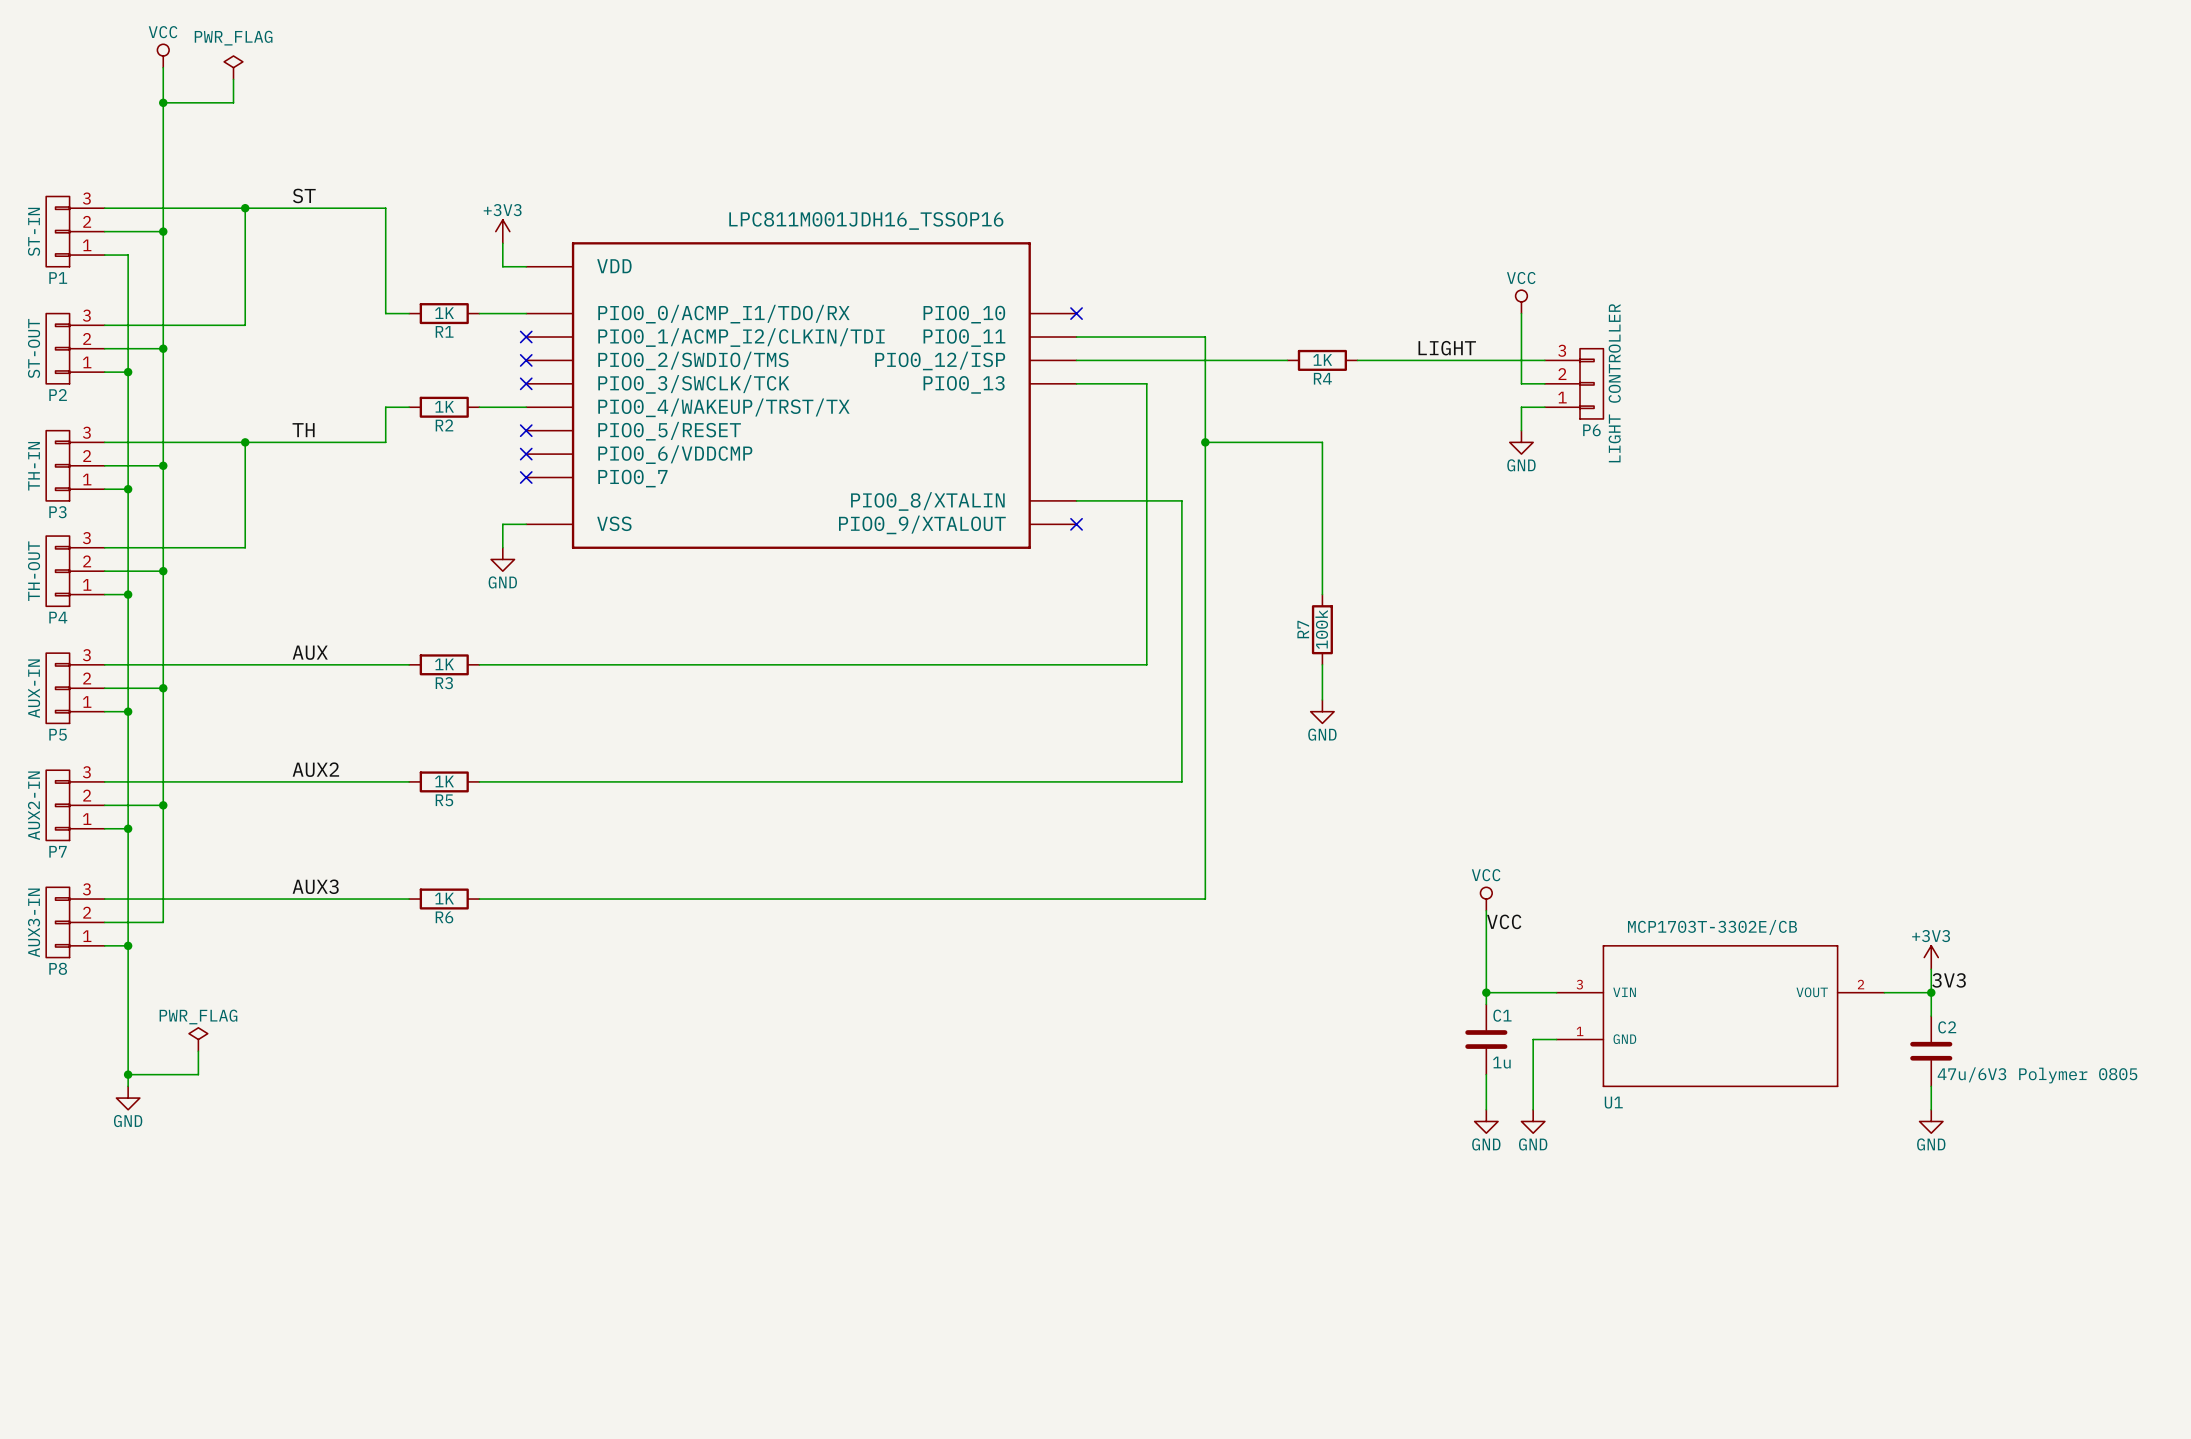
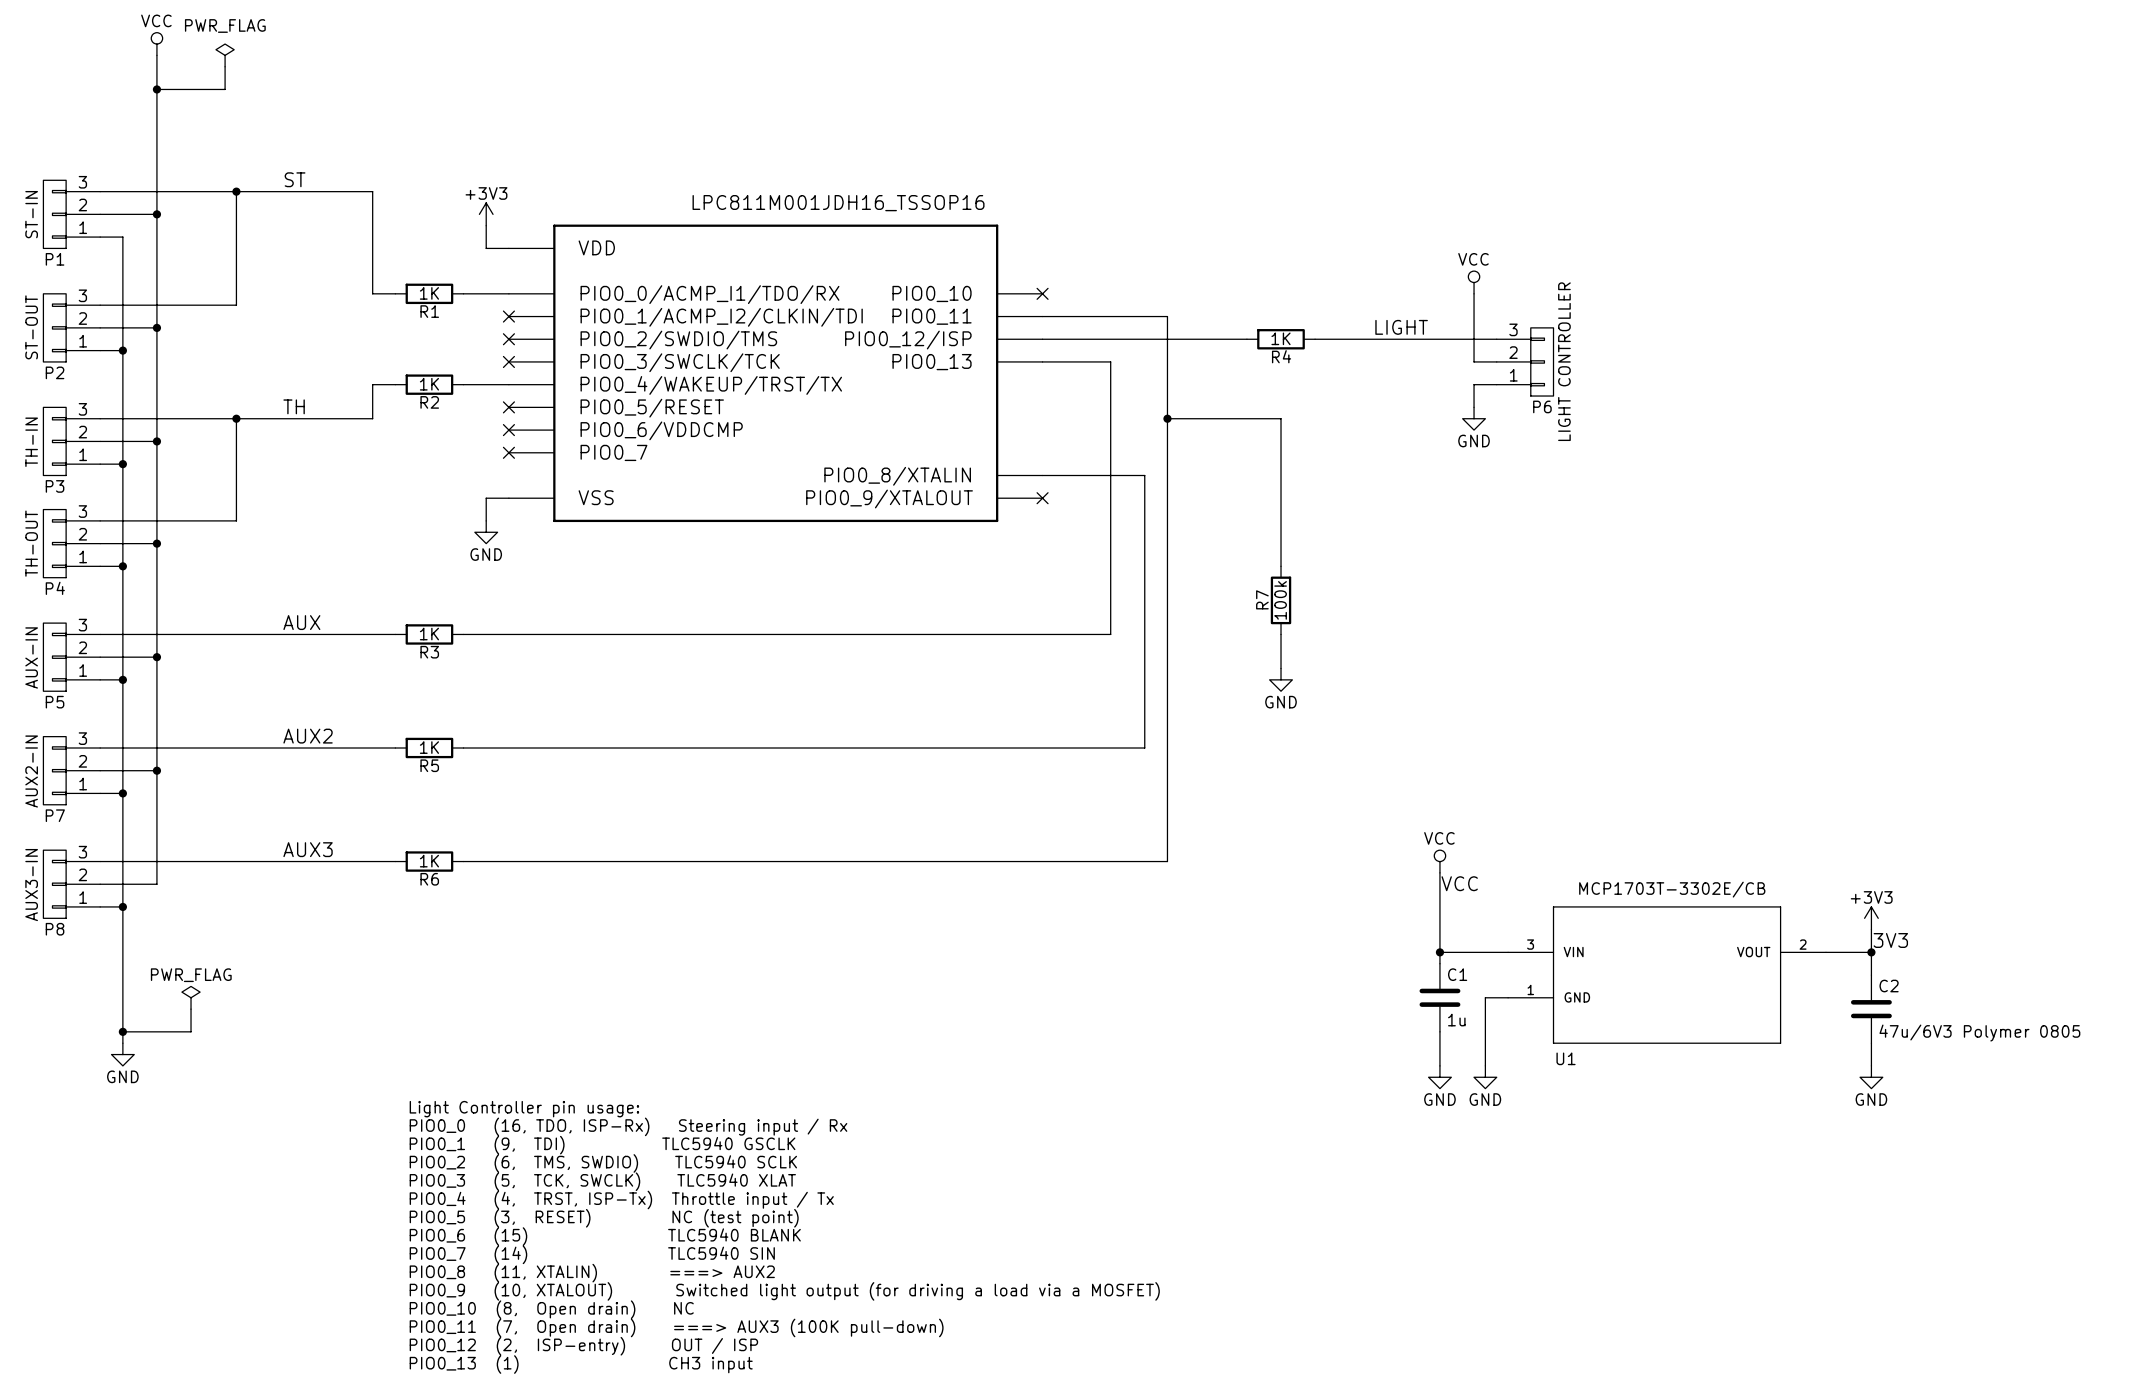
text: none -> Light Controller pin usage: (524, 1109)
text: none -> PIO0_0 (16, TDO, ISP-Rx) Steering input / Rx (628, 1126)
text: none -> PIO0_1 (9, TDI) TLC5940 GSCLK (602, 1145)
text: none -> PIO0_2 (6, TMS, SWDIO) TLC5940 SCLK (603, 1163)
text: none -> PIO0_3 (5, TCK, SWCLK) TLC5940 XLAT (602, 1181)
text: none -> PIO0_4 (4, TRST, ISP-Tx) Throttle input / Tx (621, 1200)
text: none -> PIO0_5 (3, RESET) NC (test point) (604, 1218)
text: none -> PIO0_6 (15) TLC5940 BLANK (605, 1236)
text: none -> PIO0_7 (14) TLC5940 SIN (592, 1254)
text: none -> PIO0_8 (11, XTALIN) ===> AUX2 (592, 1273)
text: none -> PIO0_9 (10, XTALOUT) Switched light output (for driving a load via a MOSFET) (784, 1291)
text: none -> PIO0_10 (8, Open drain) NC (551, 1309)
text: none -> PIO0_11 (7, Open drain) ===> AUX3 (100K pull-down) (676, 1327)
text: none -> PIO0_12 (2, ISP-entry) OUT / ISP (583, 1346)
text: none -> PIO0_13 (1) CH3 input (581, 1364)

